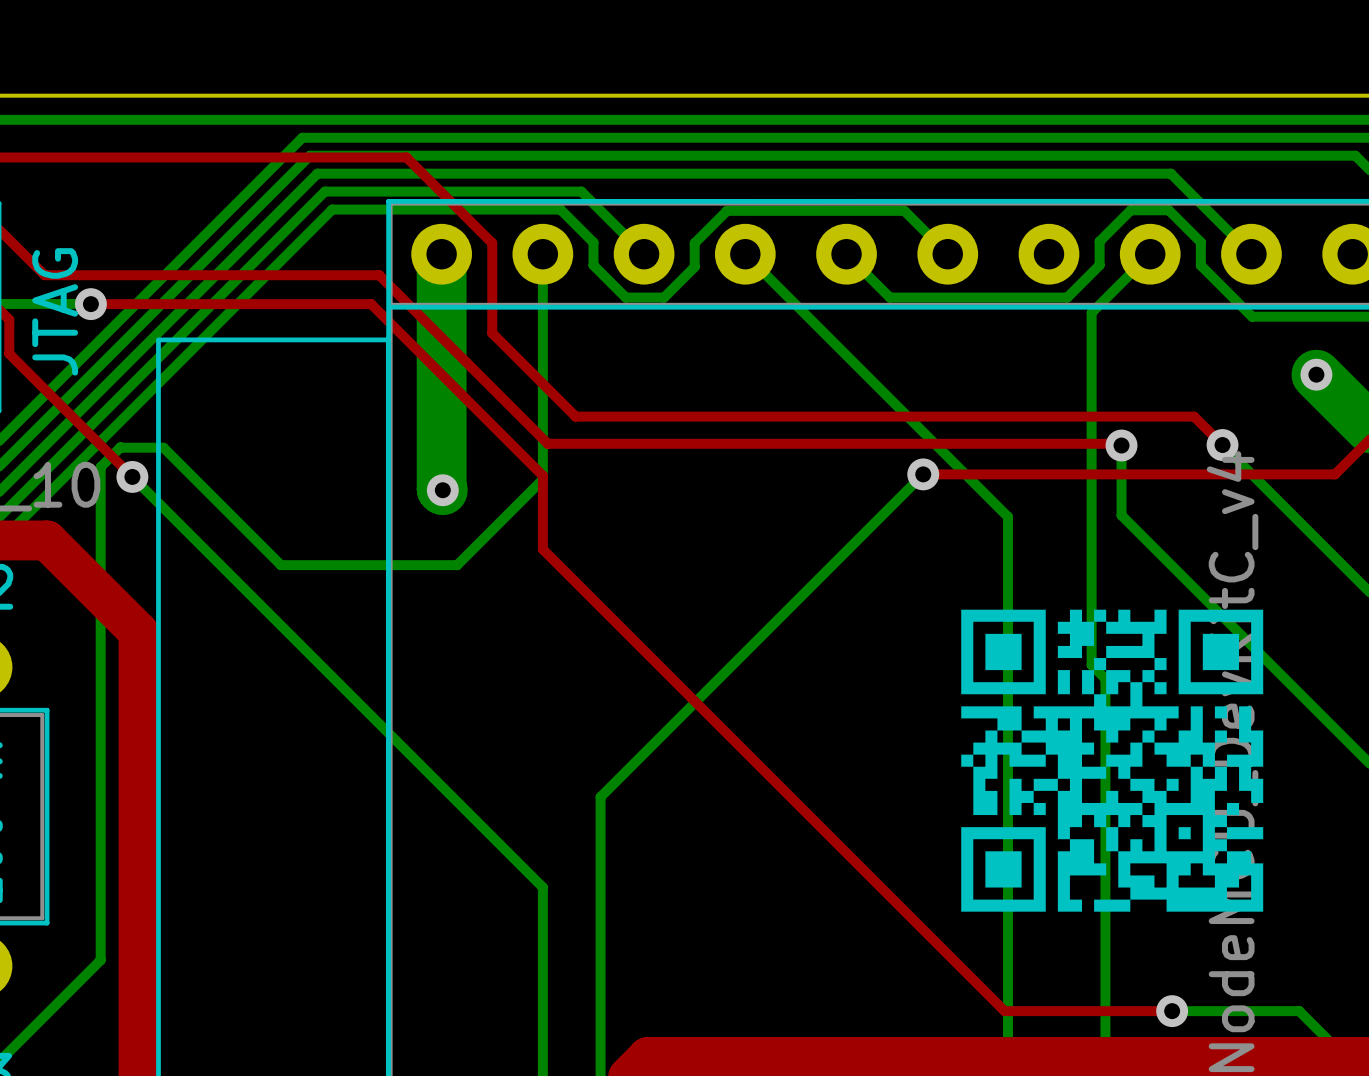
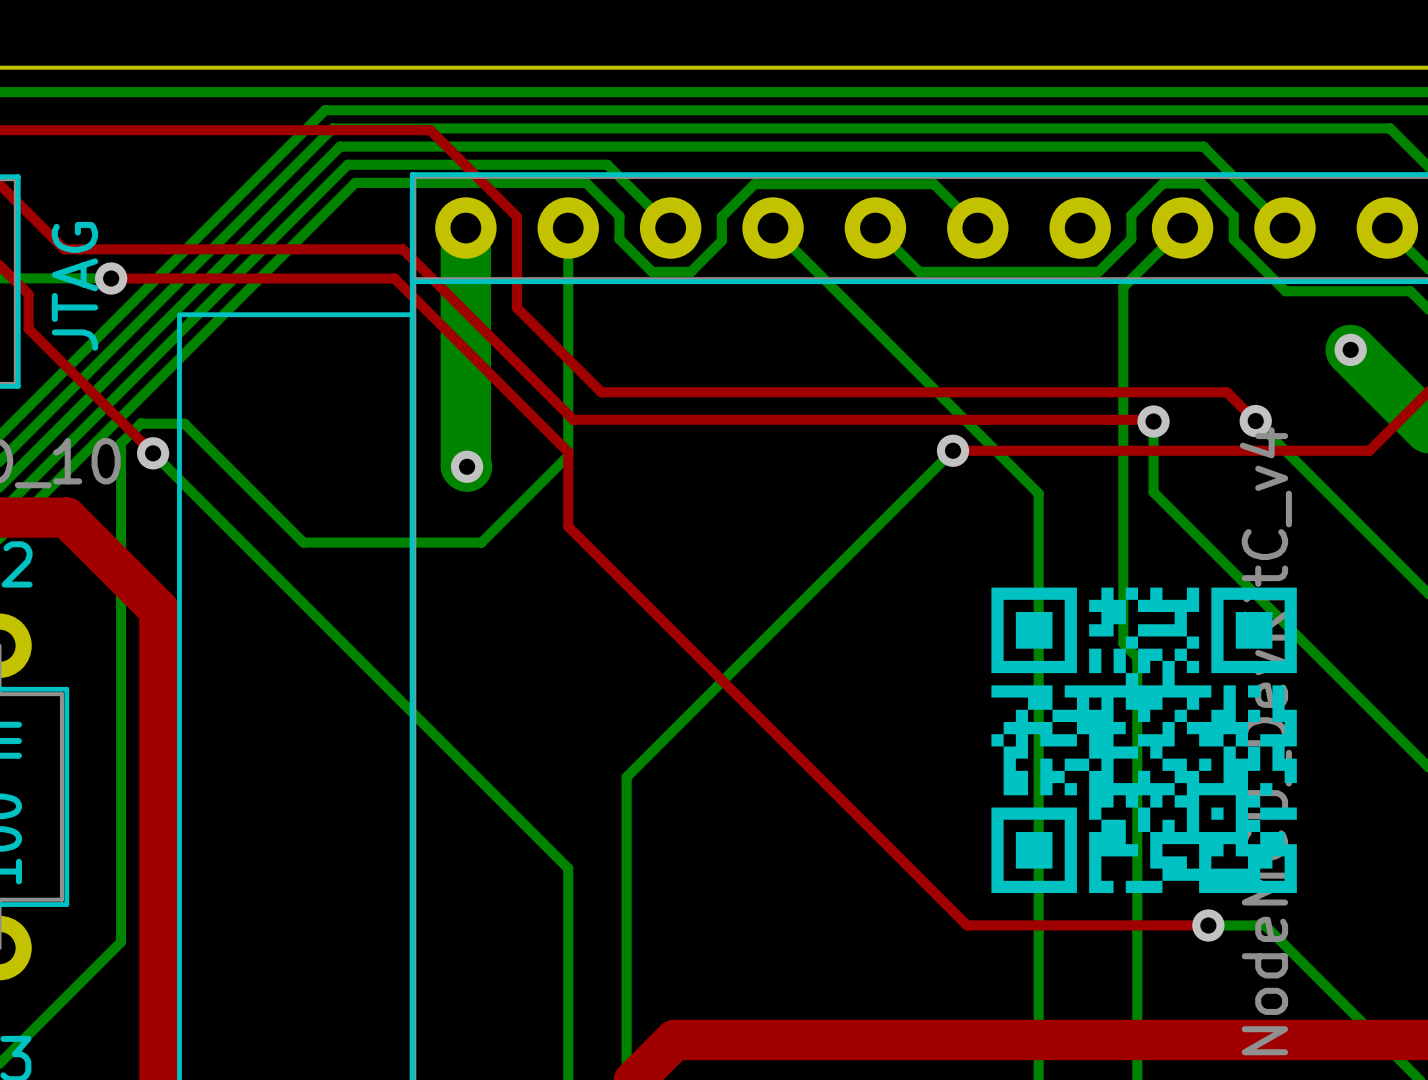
top track: (937, 943) (1004, 1011) (1172, 1011) -> (967, 925) (1208, 925)
bottom track: (1172, 1011) (1299, 1011) -> (1208, 925) (1265, 925) (1333, 993)
via position: (1172, 1011) -> (1208, 925)

